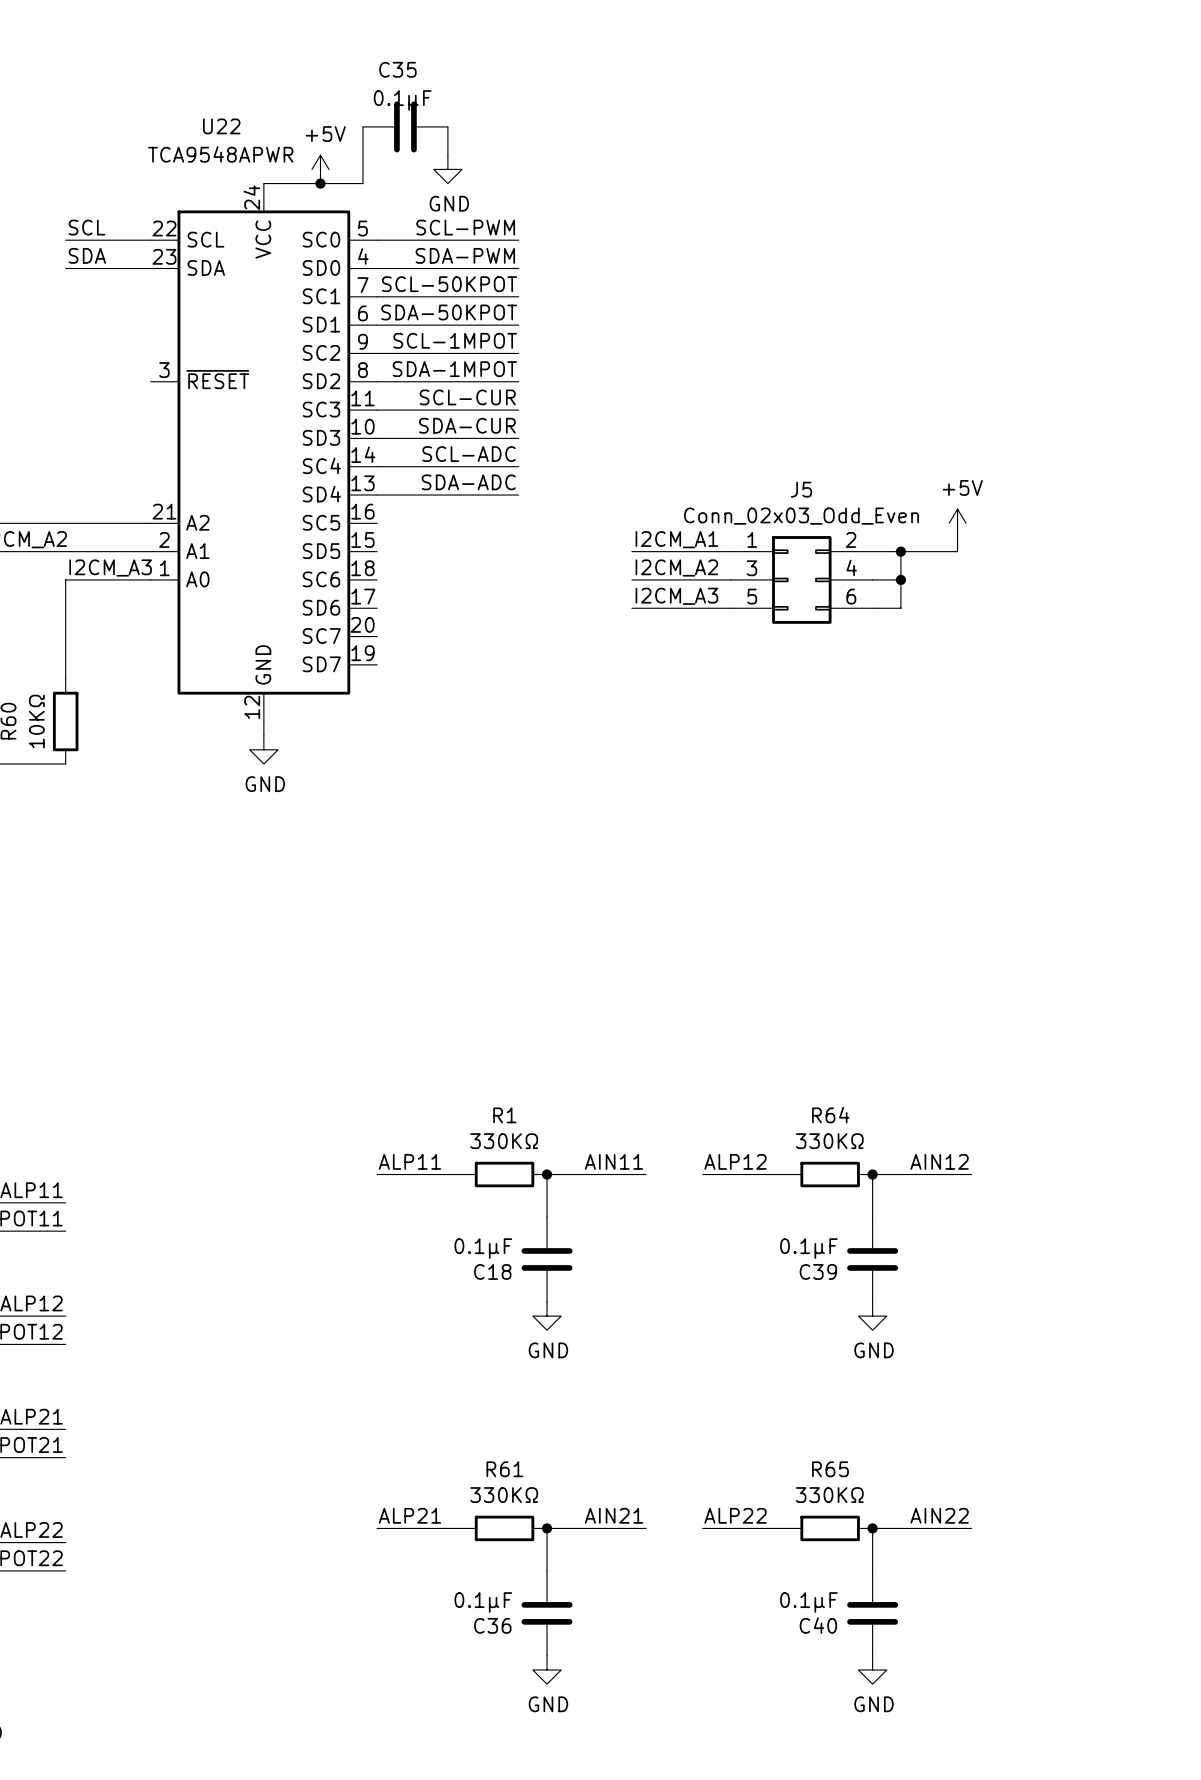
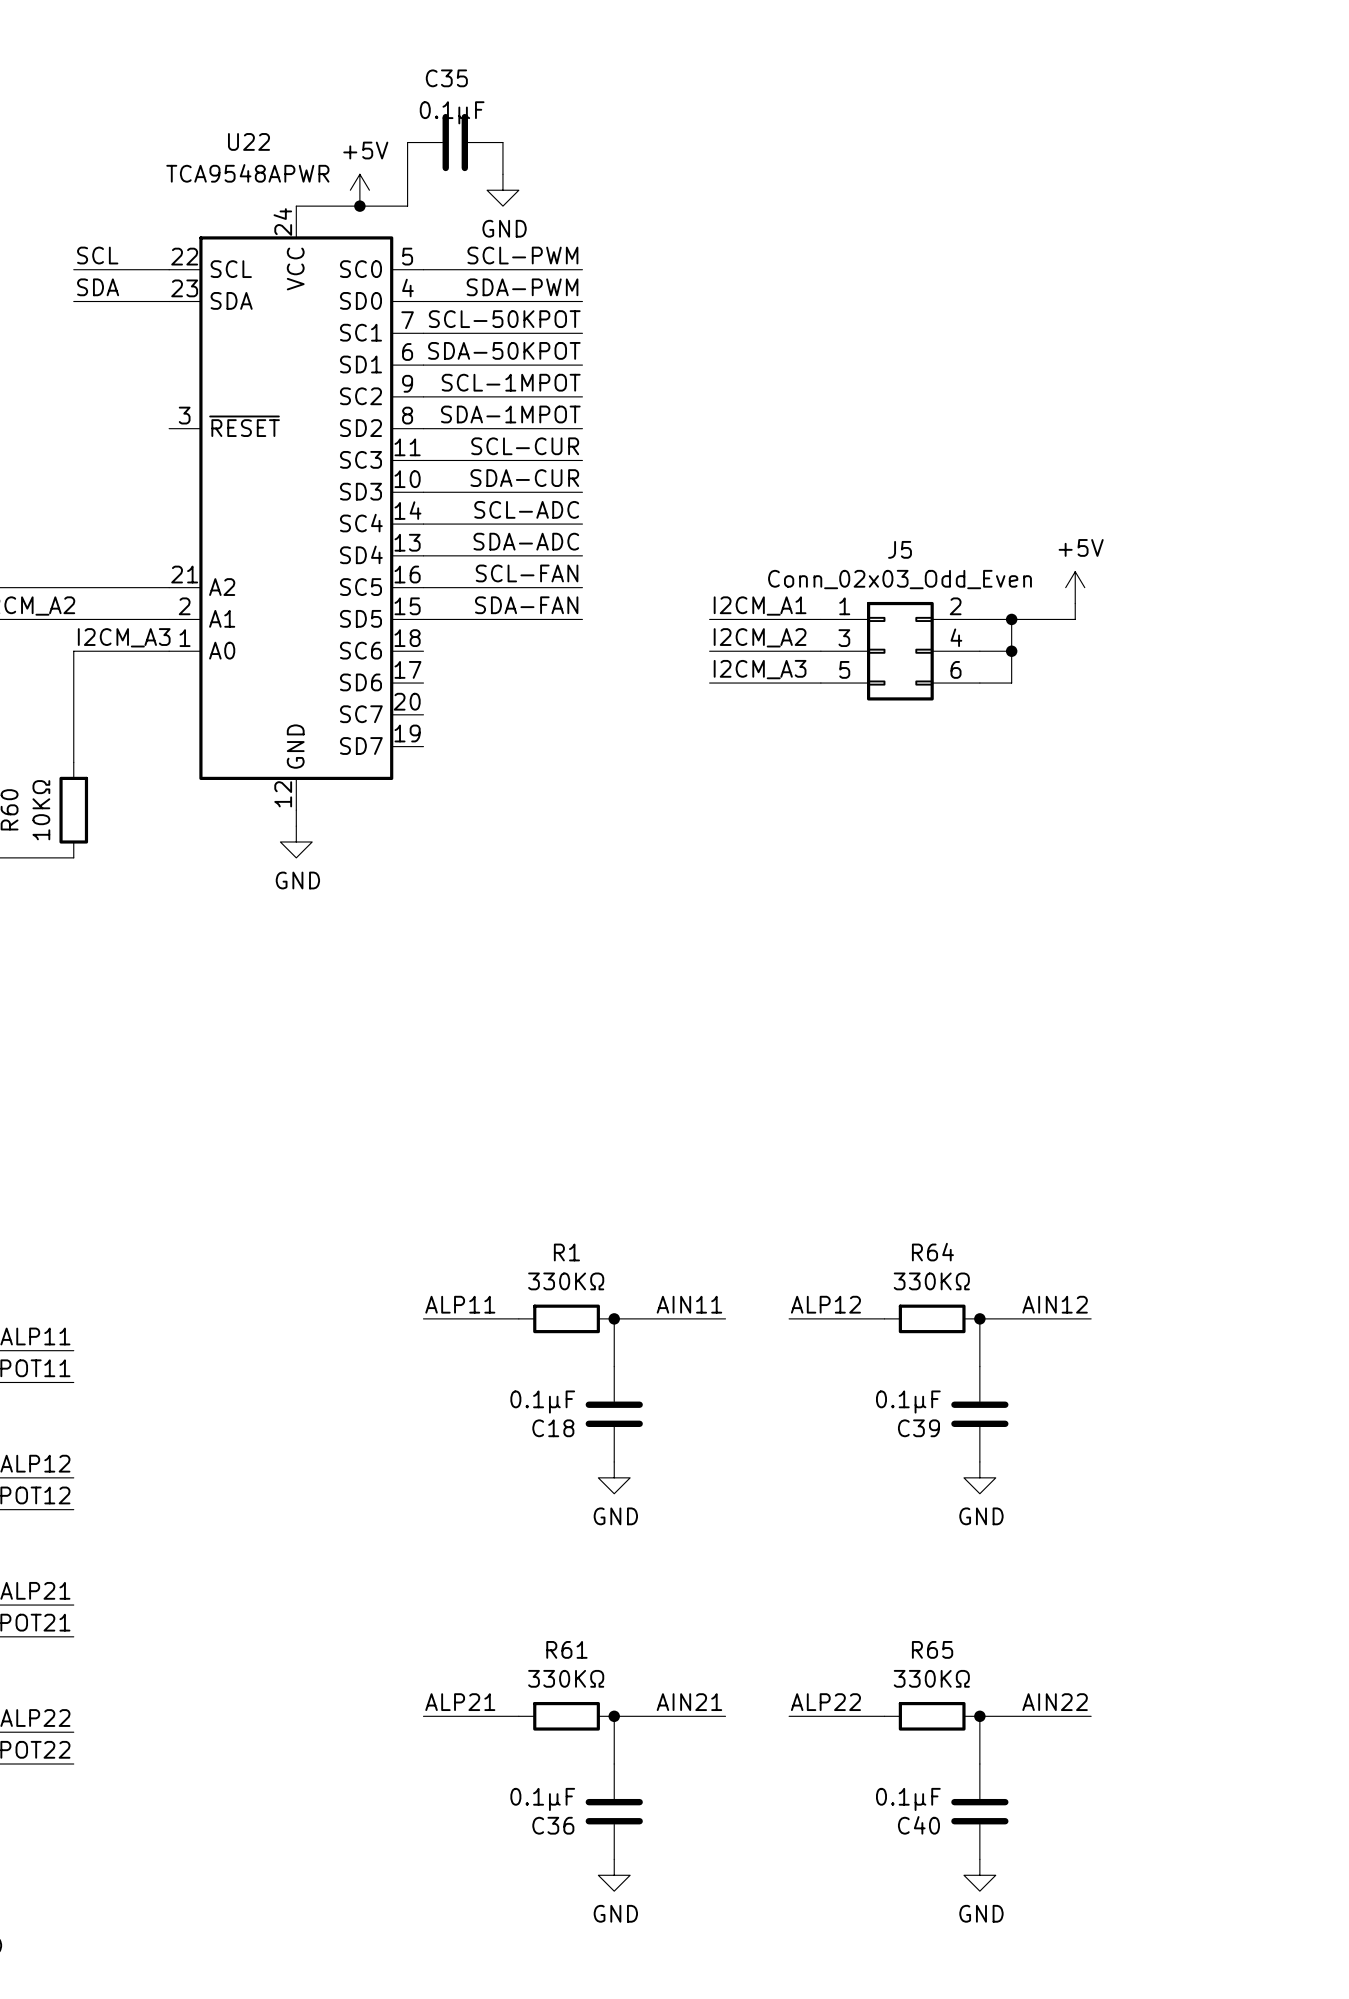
label: none -> SCL-FAN (527, 573)
wire: none -> (423, 587) (582, 587)
label: none -> SDA-FAN (526, 605)
wire: none -> (423, 619) (582, 619)

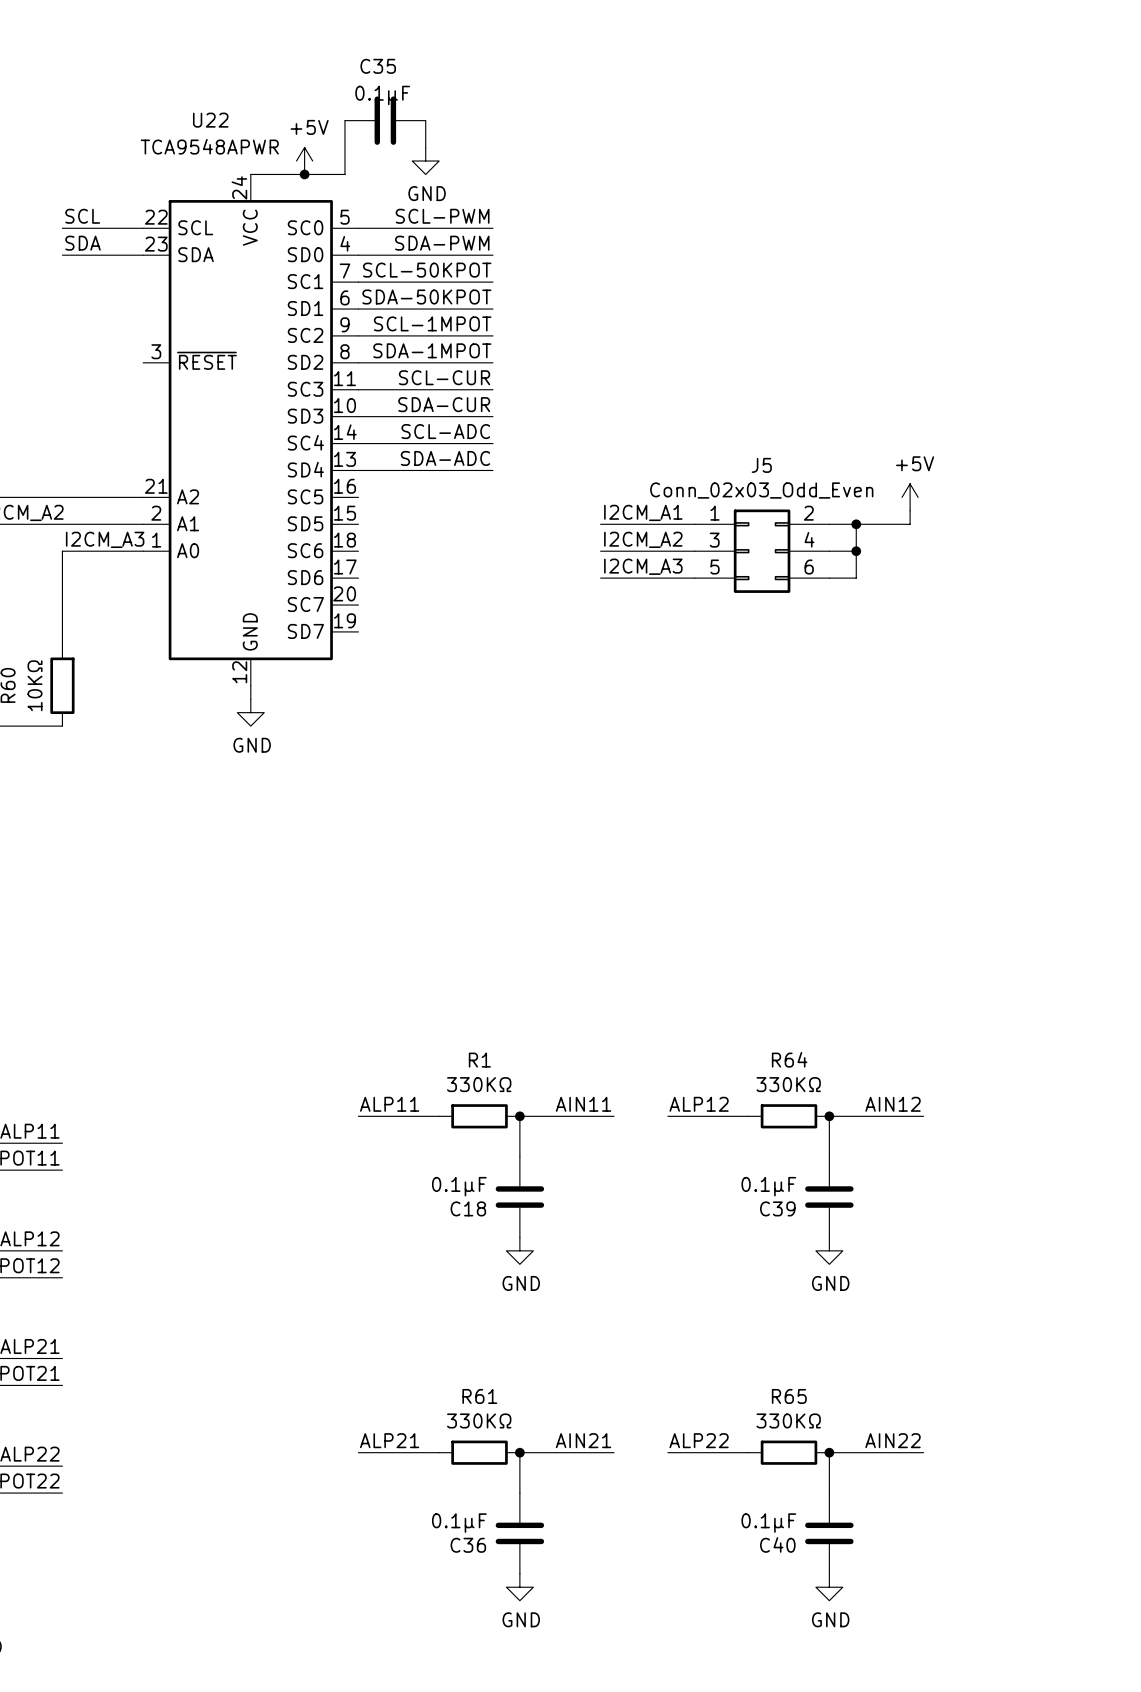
label: SCL-FAN (527, 573) -> none
wire: (423, 587) (582, 587) -> none
label: SDA-FAN (526, 605) -> none
wire: (423, 619) (582, 619) -> none

